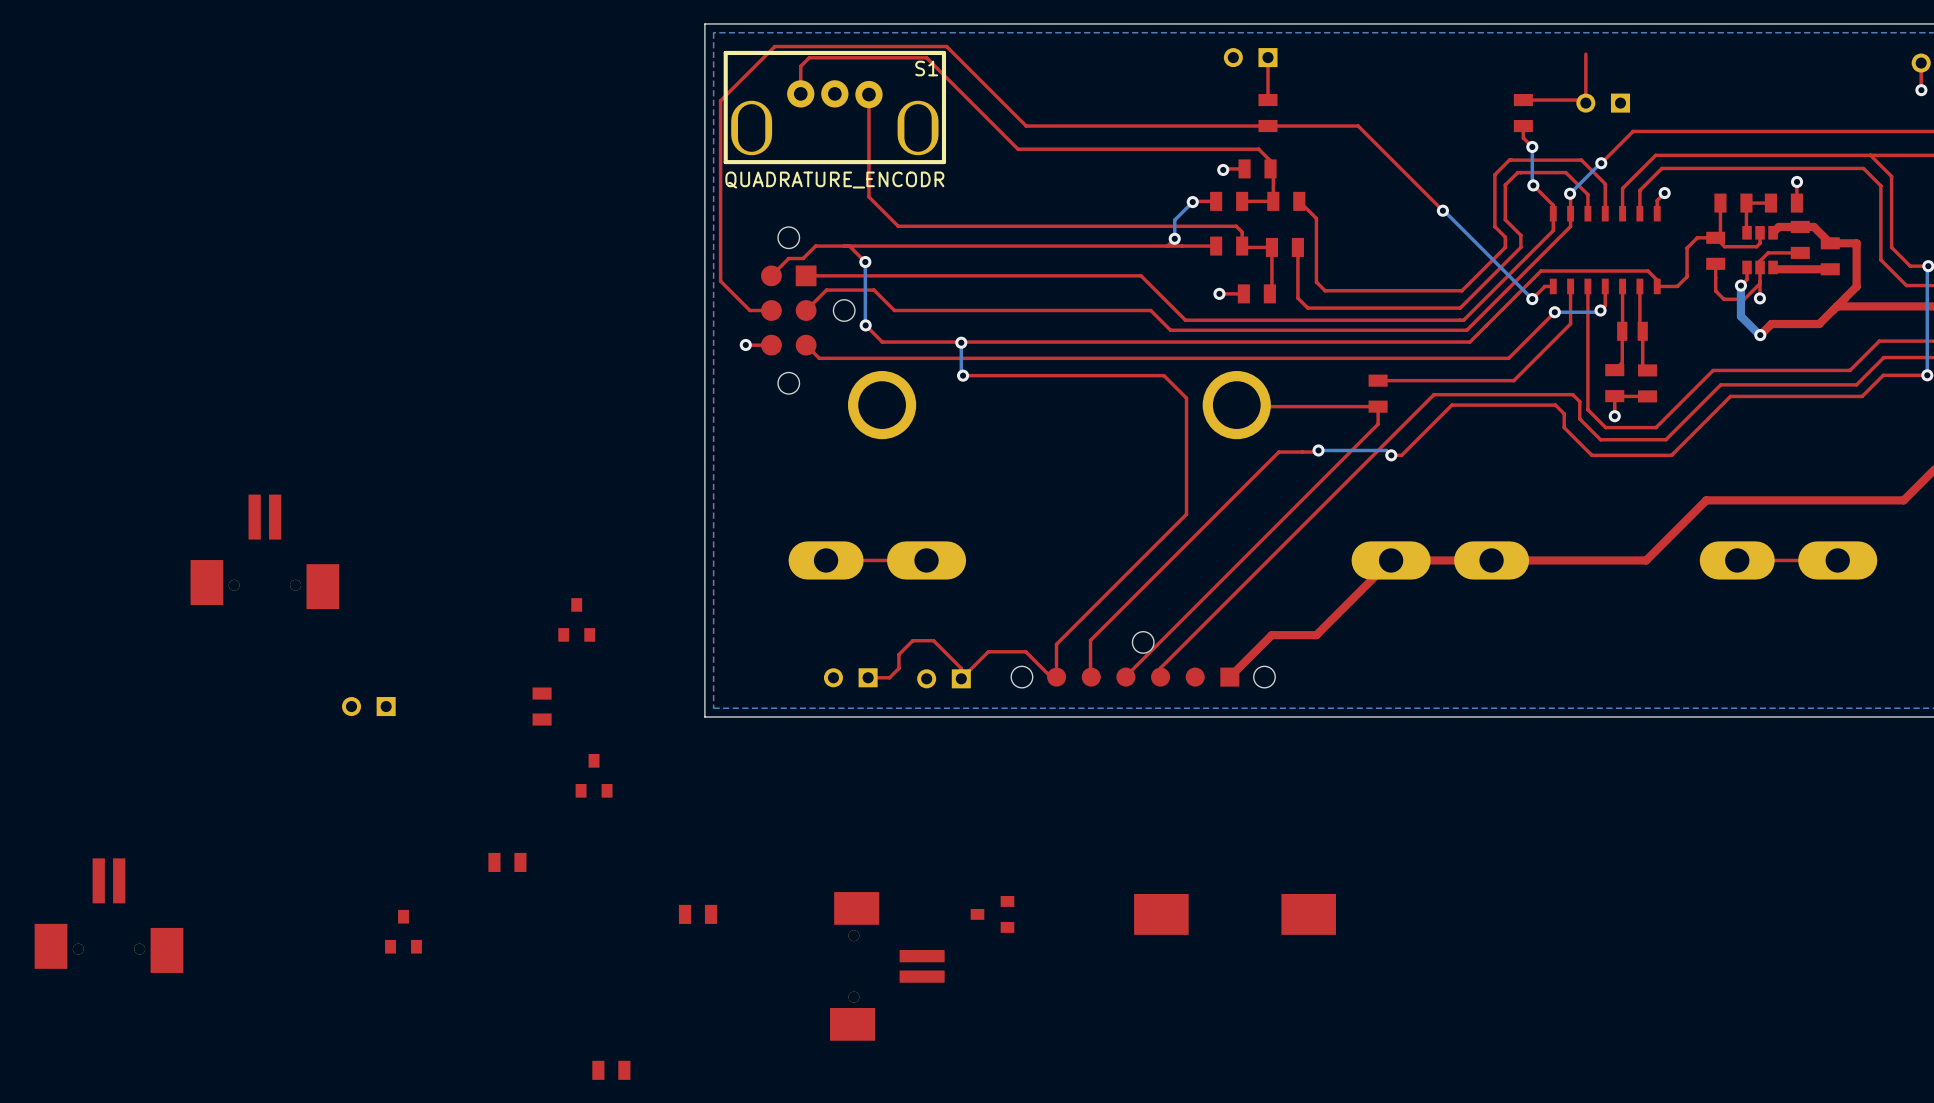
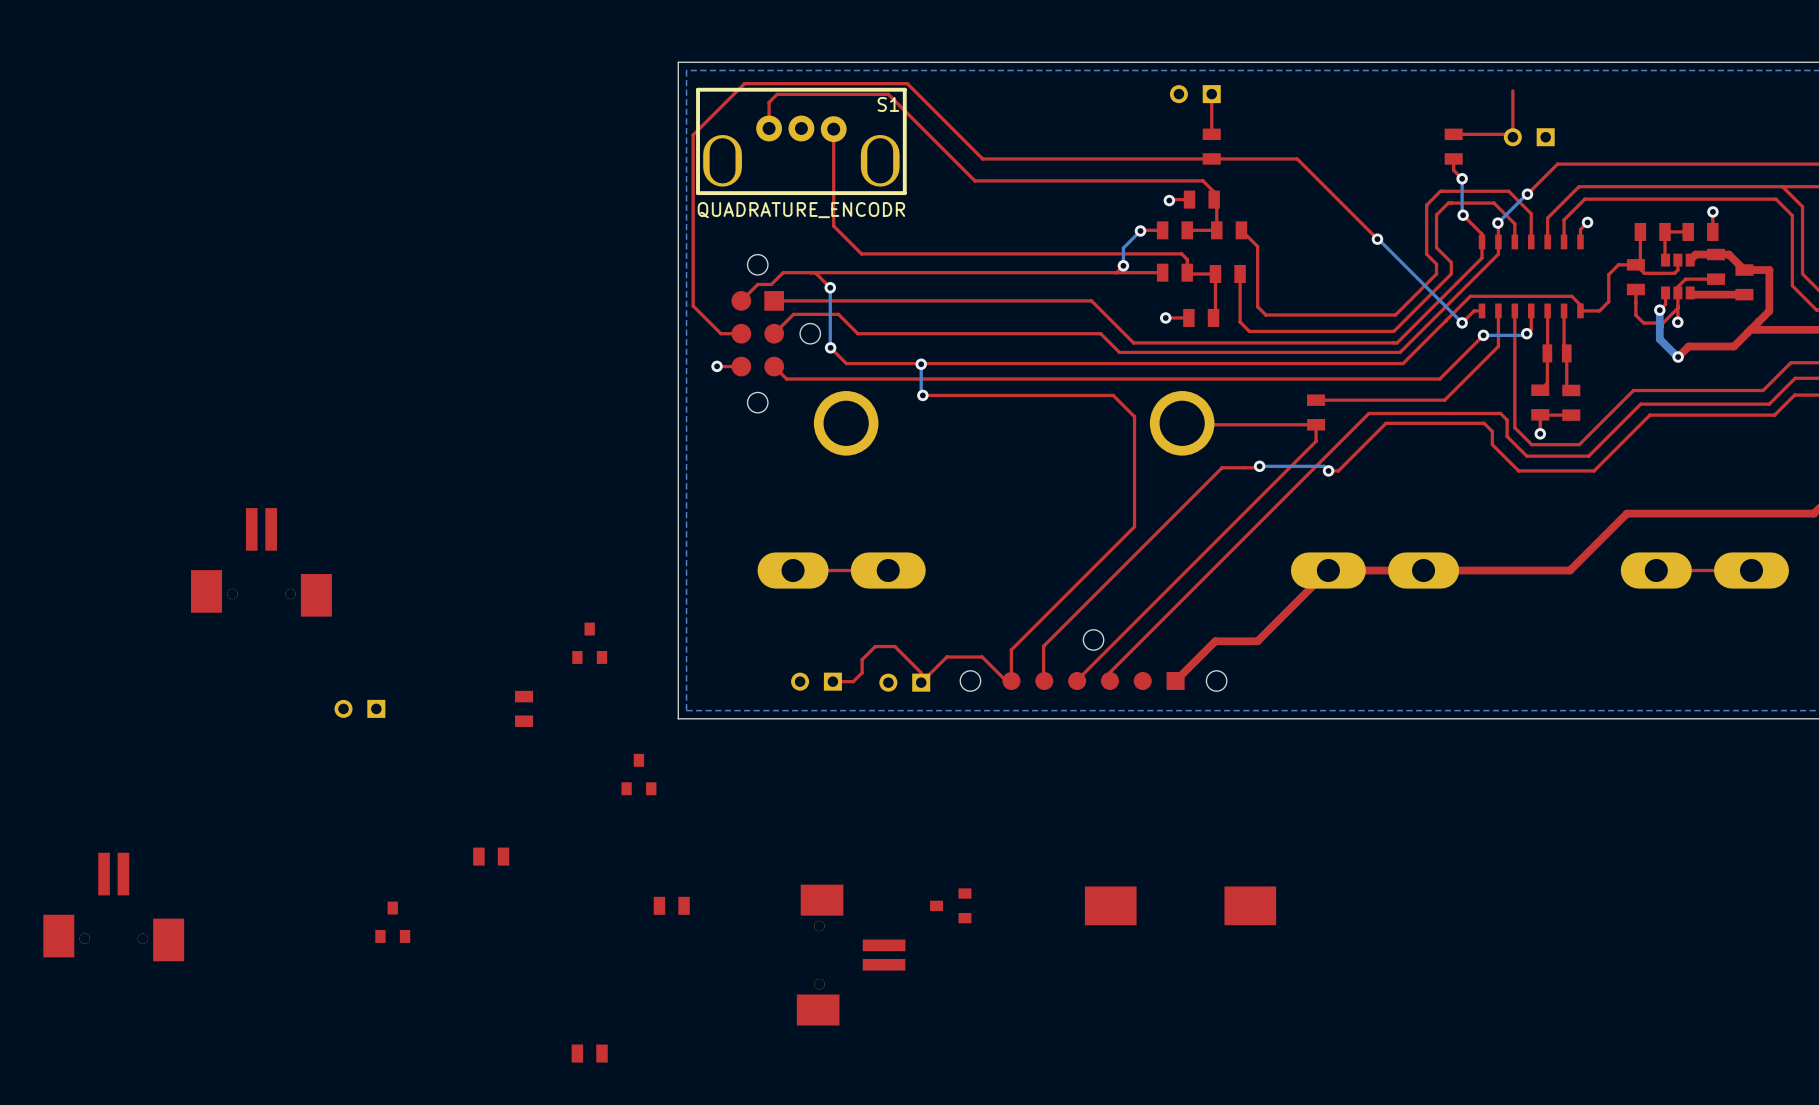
part position: (576, 619) -> (589, 643)
part footprint: [1011, 631, 1276, 688] -> [960, 629, 1227, 692]
part position: (594, 775) -> (638, 774)

